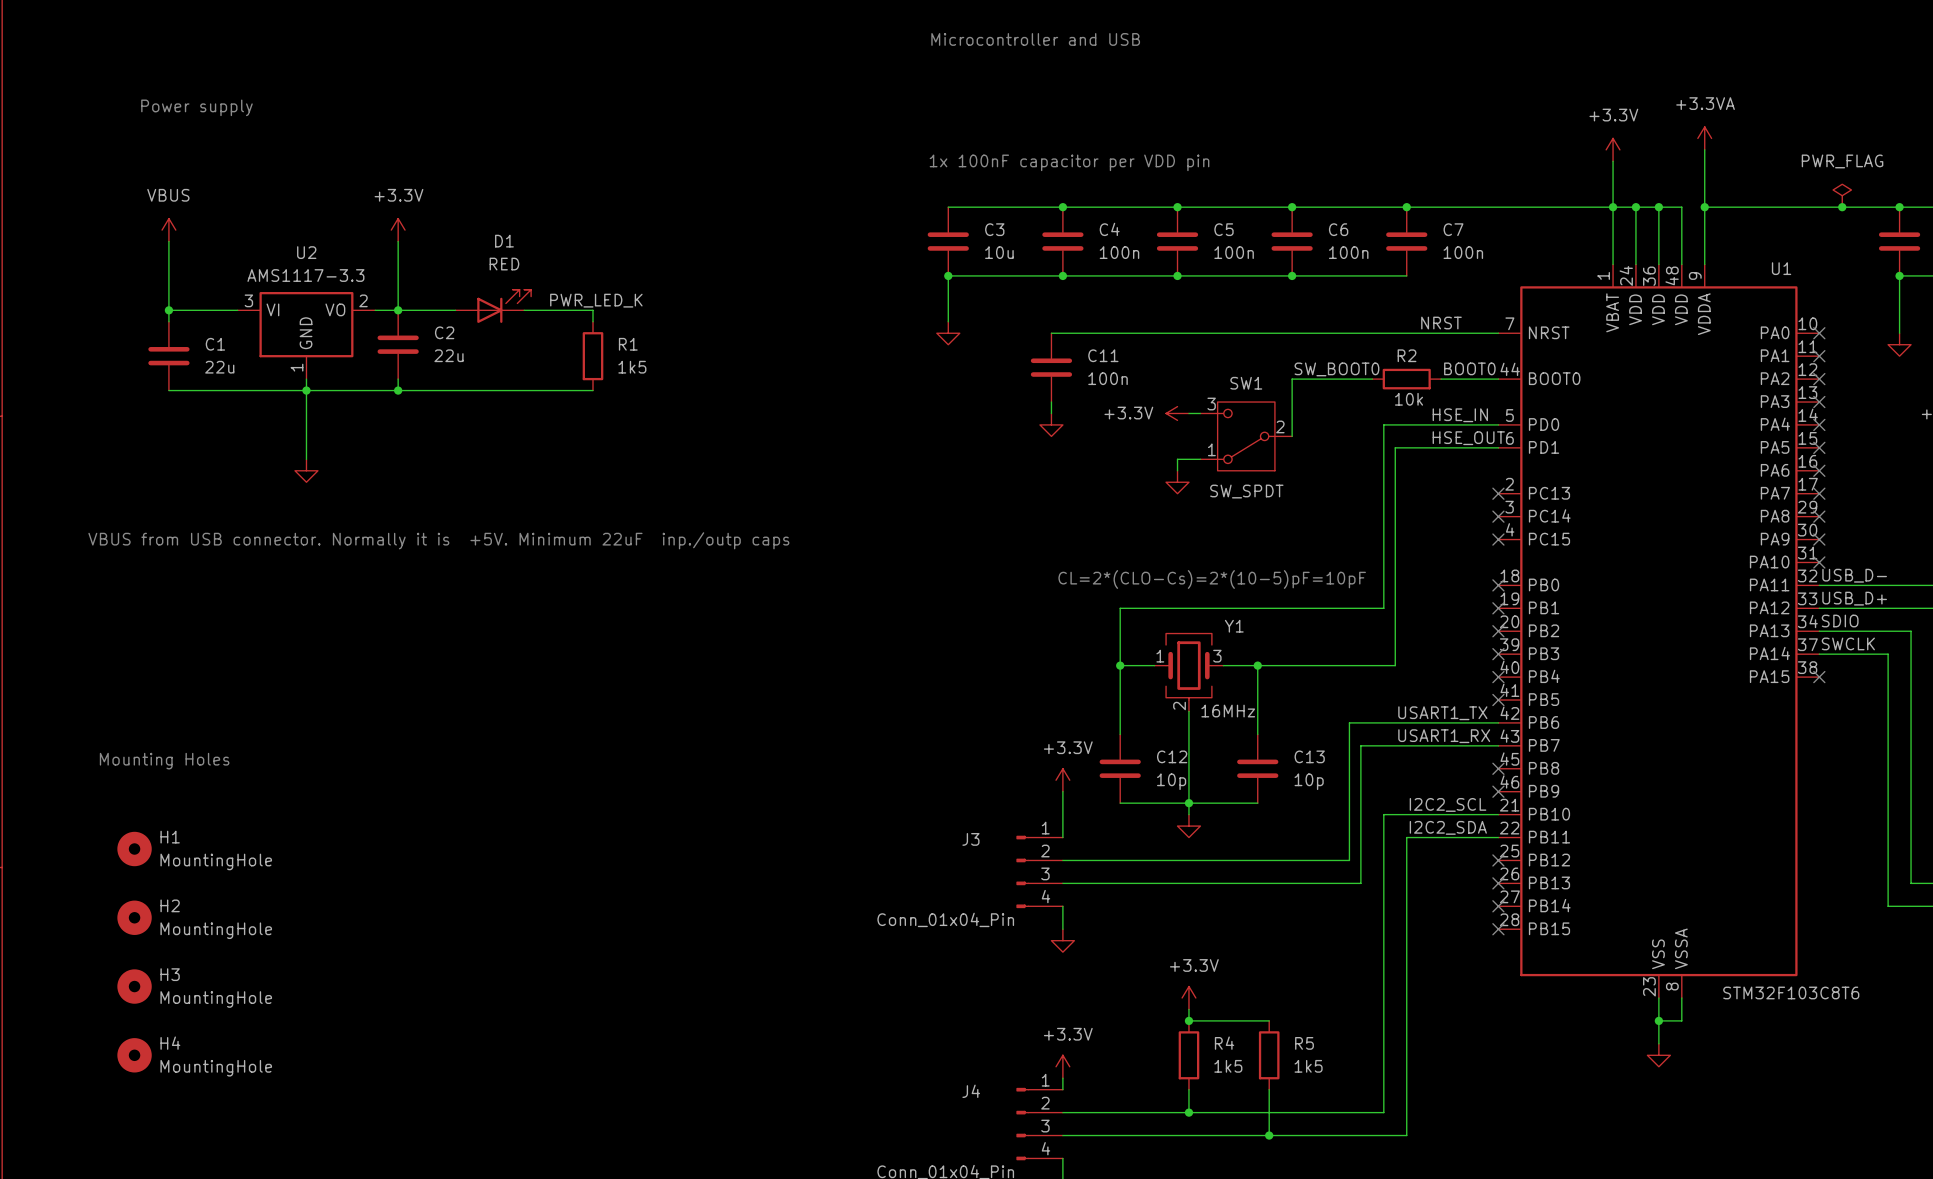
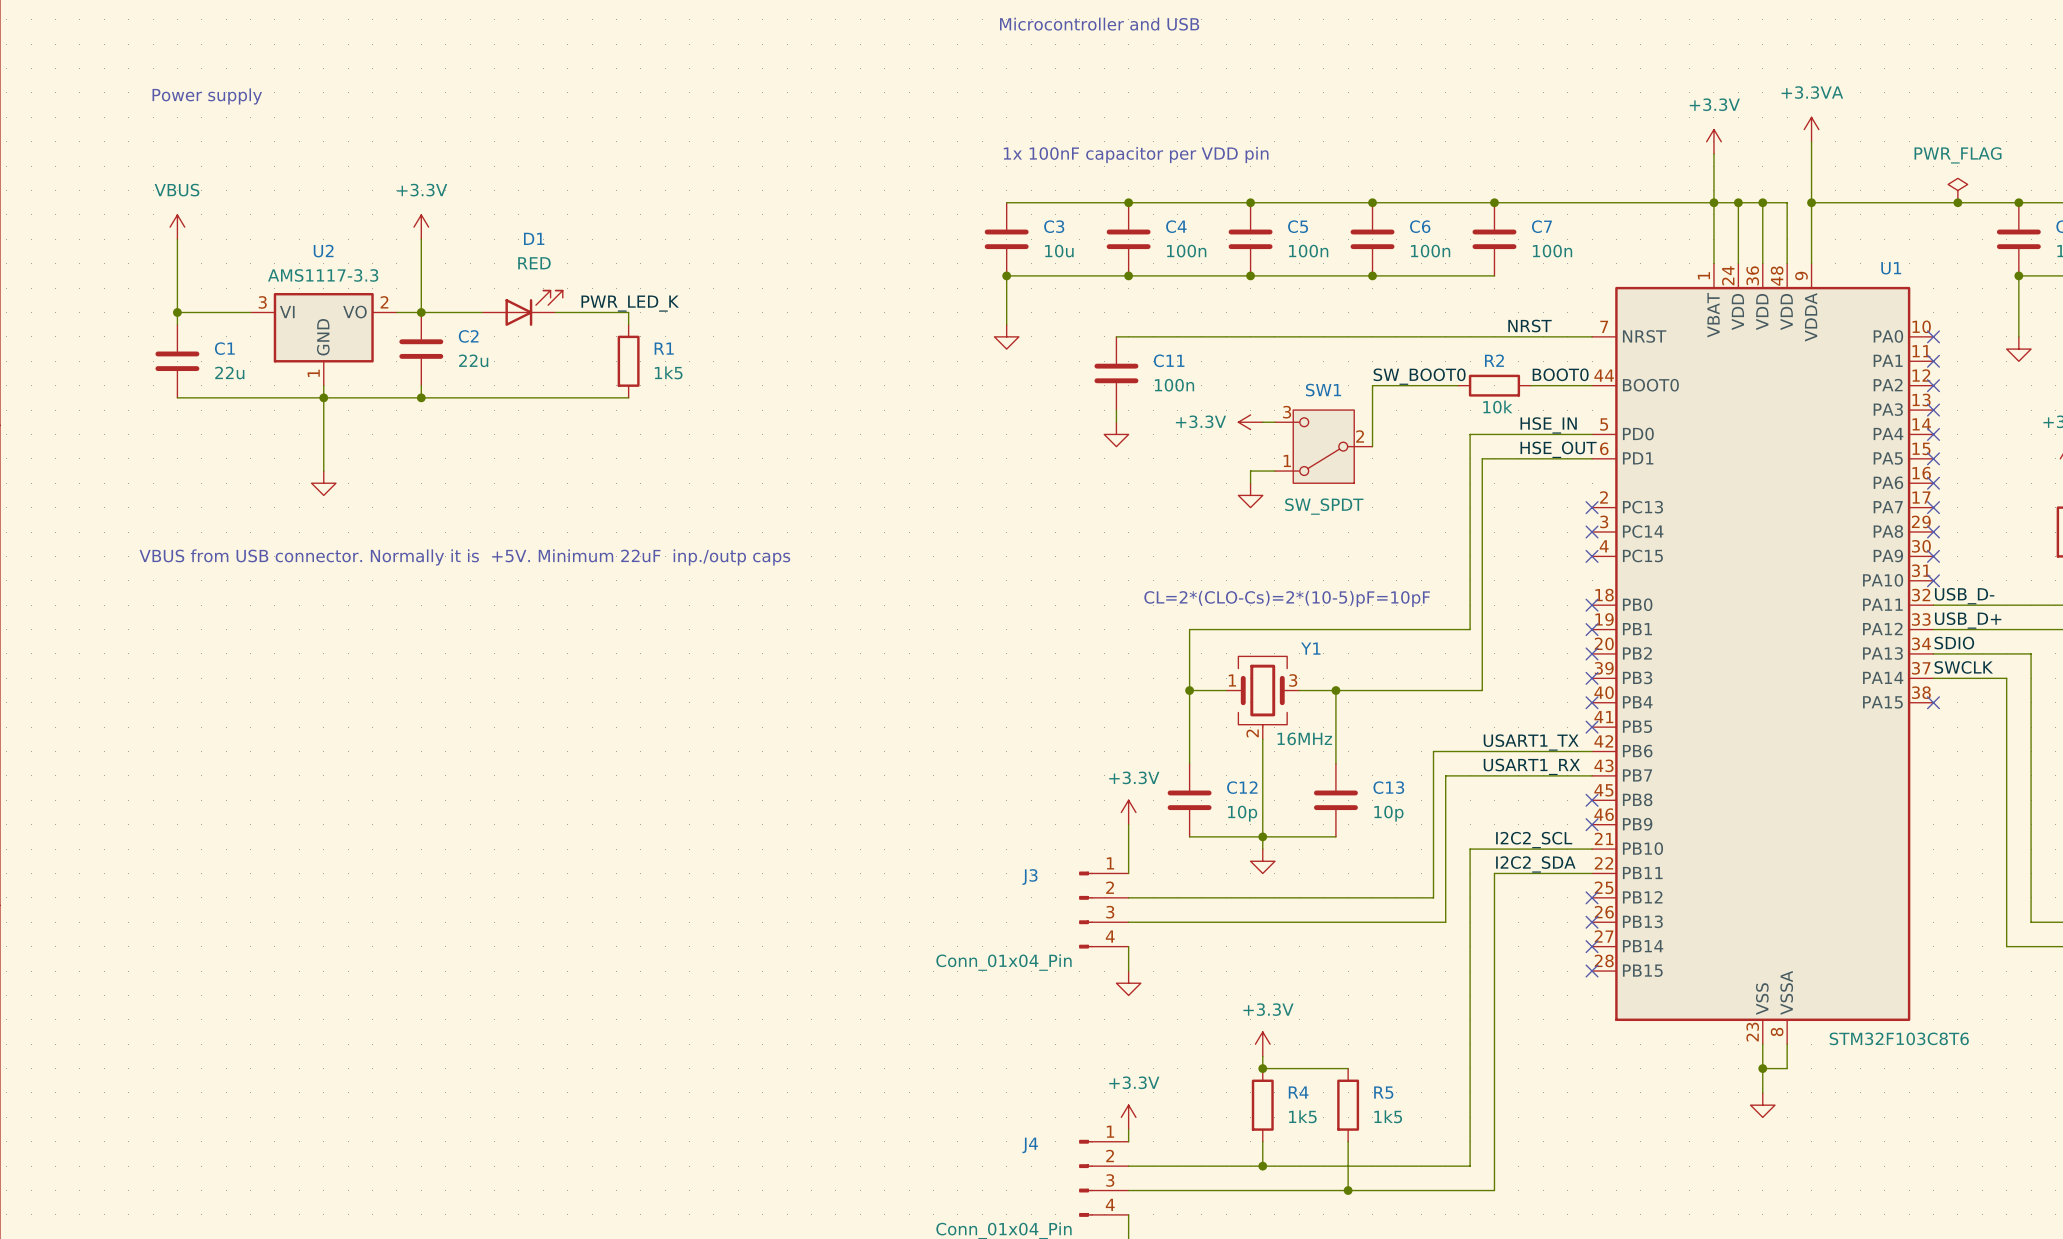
text: Mounting Holes (164, 761) -> none
H1: MountingHole (134, 849) -> none
H2: MountingHole (134, 917) -> none
H3: MountingHole (134, 986) -> none
H4: MountingHole (134, 1055) -> none

